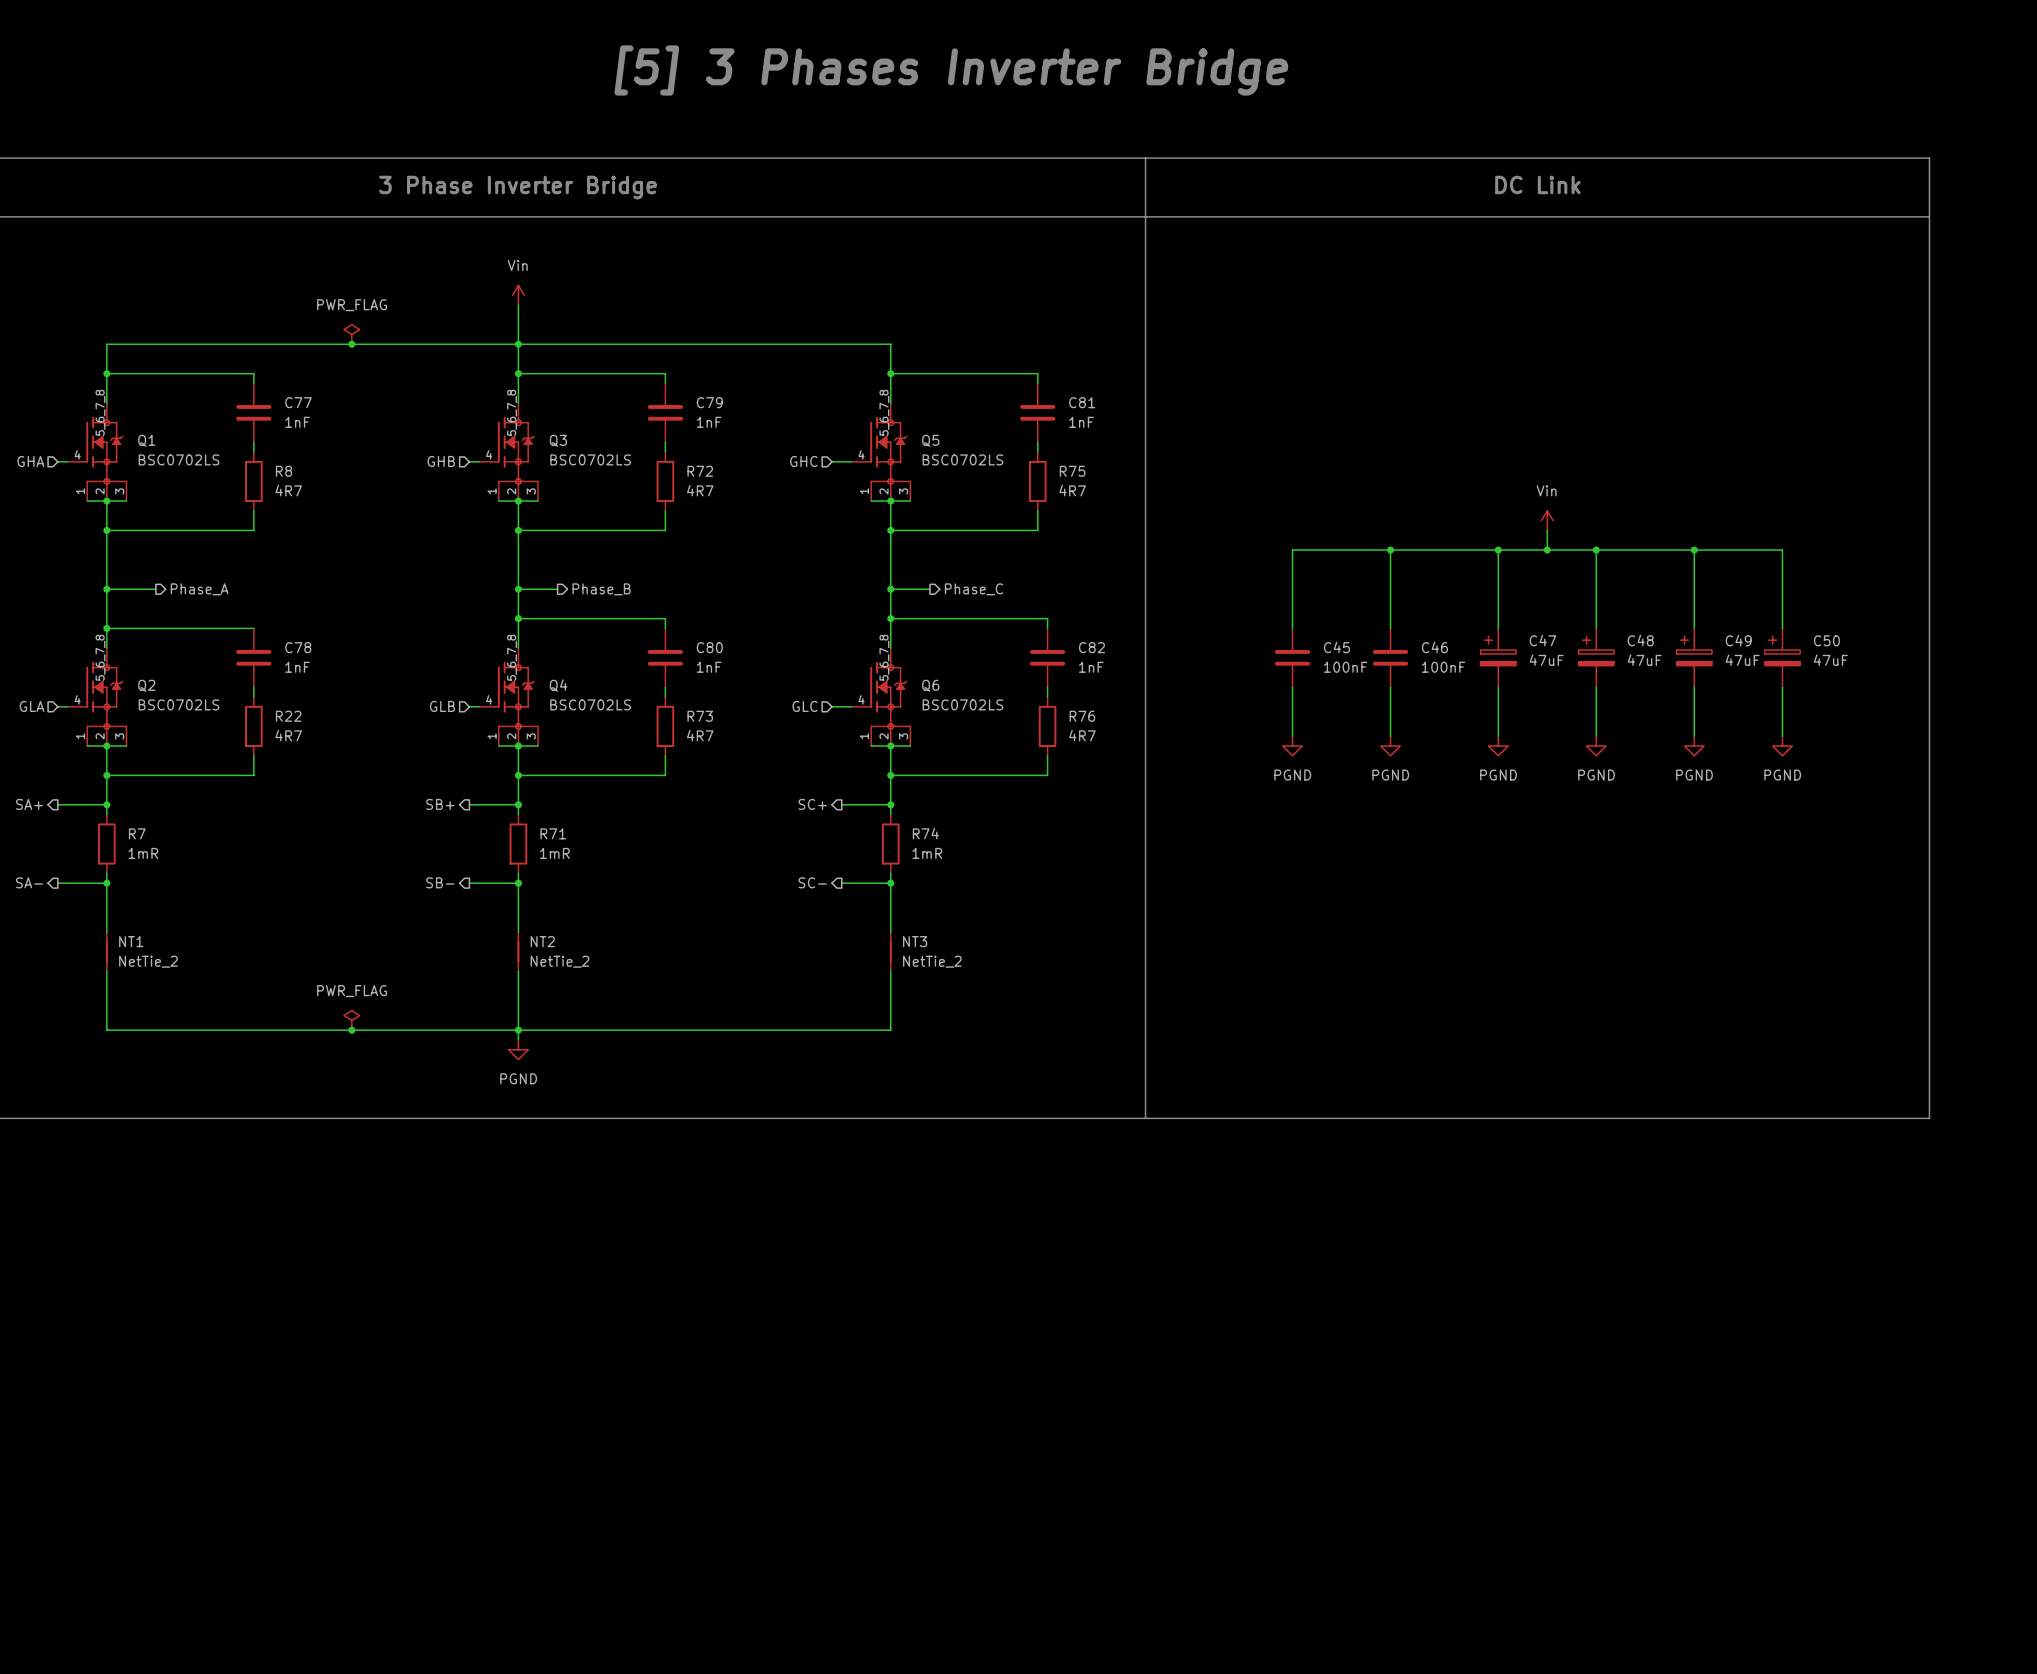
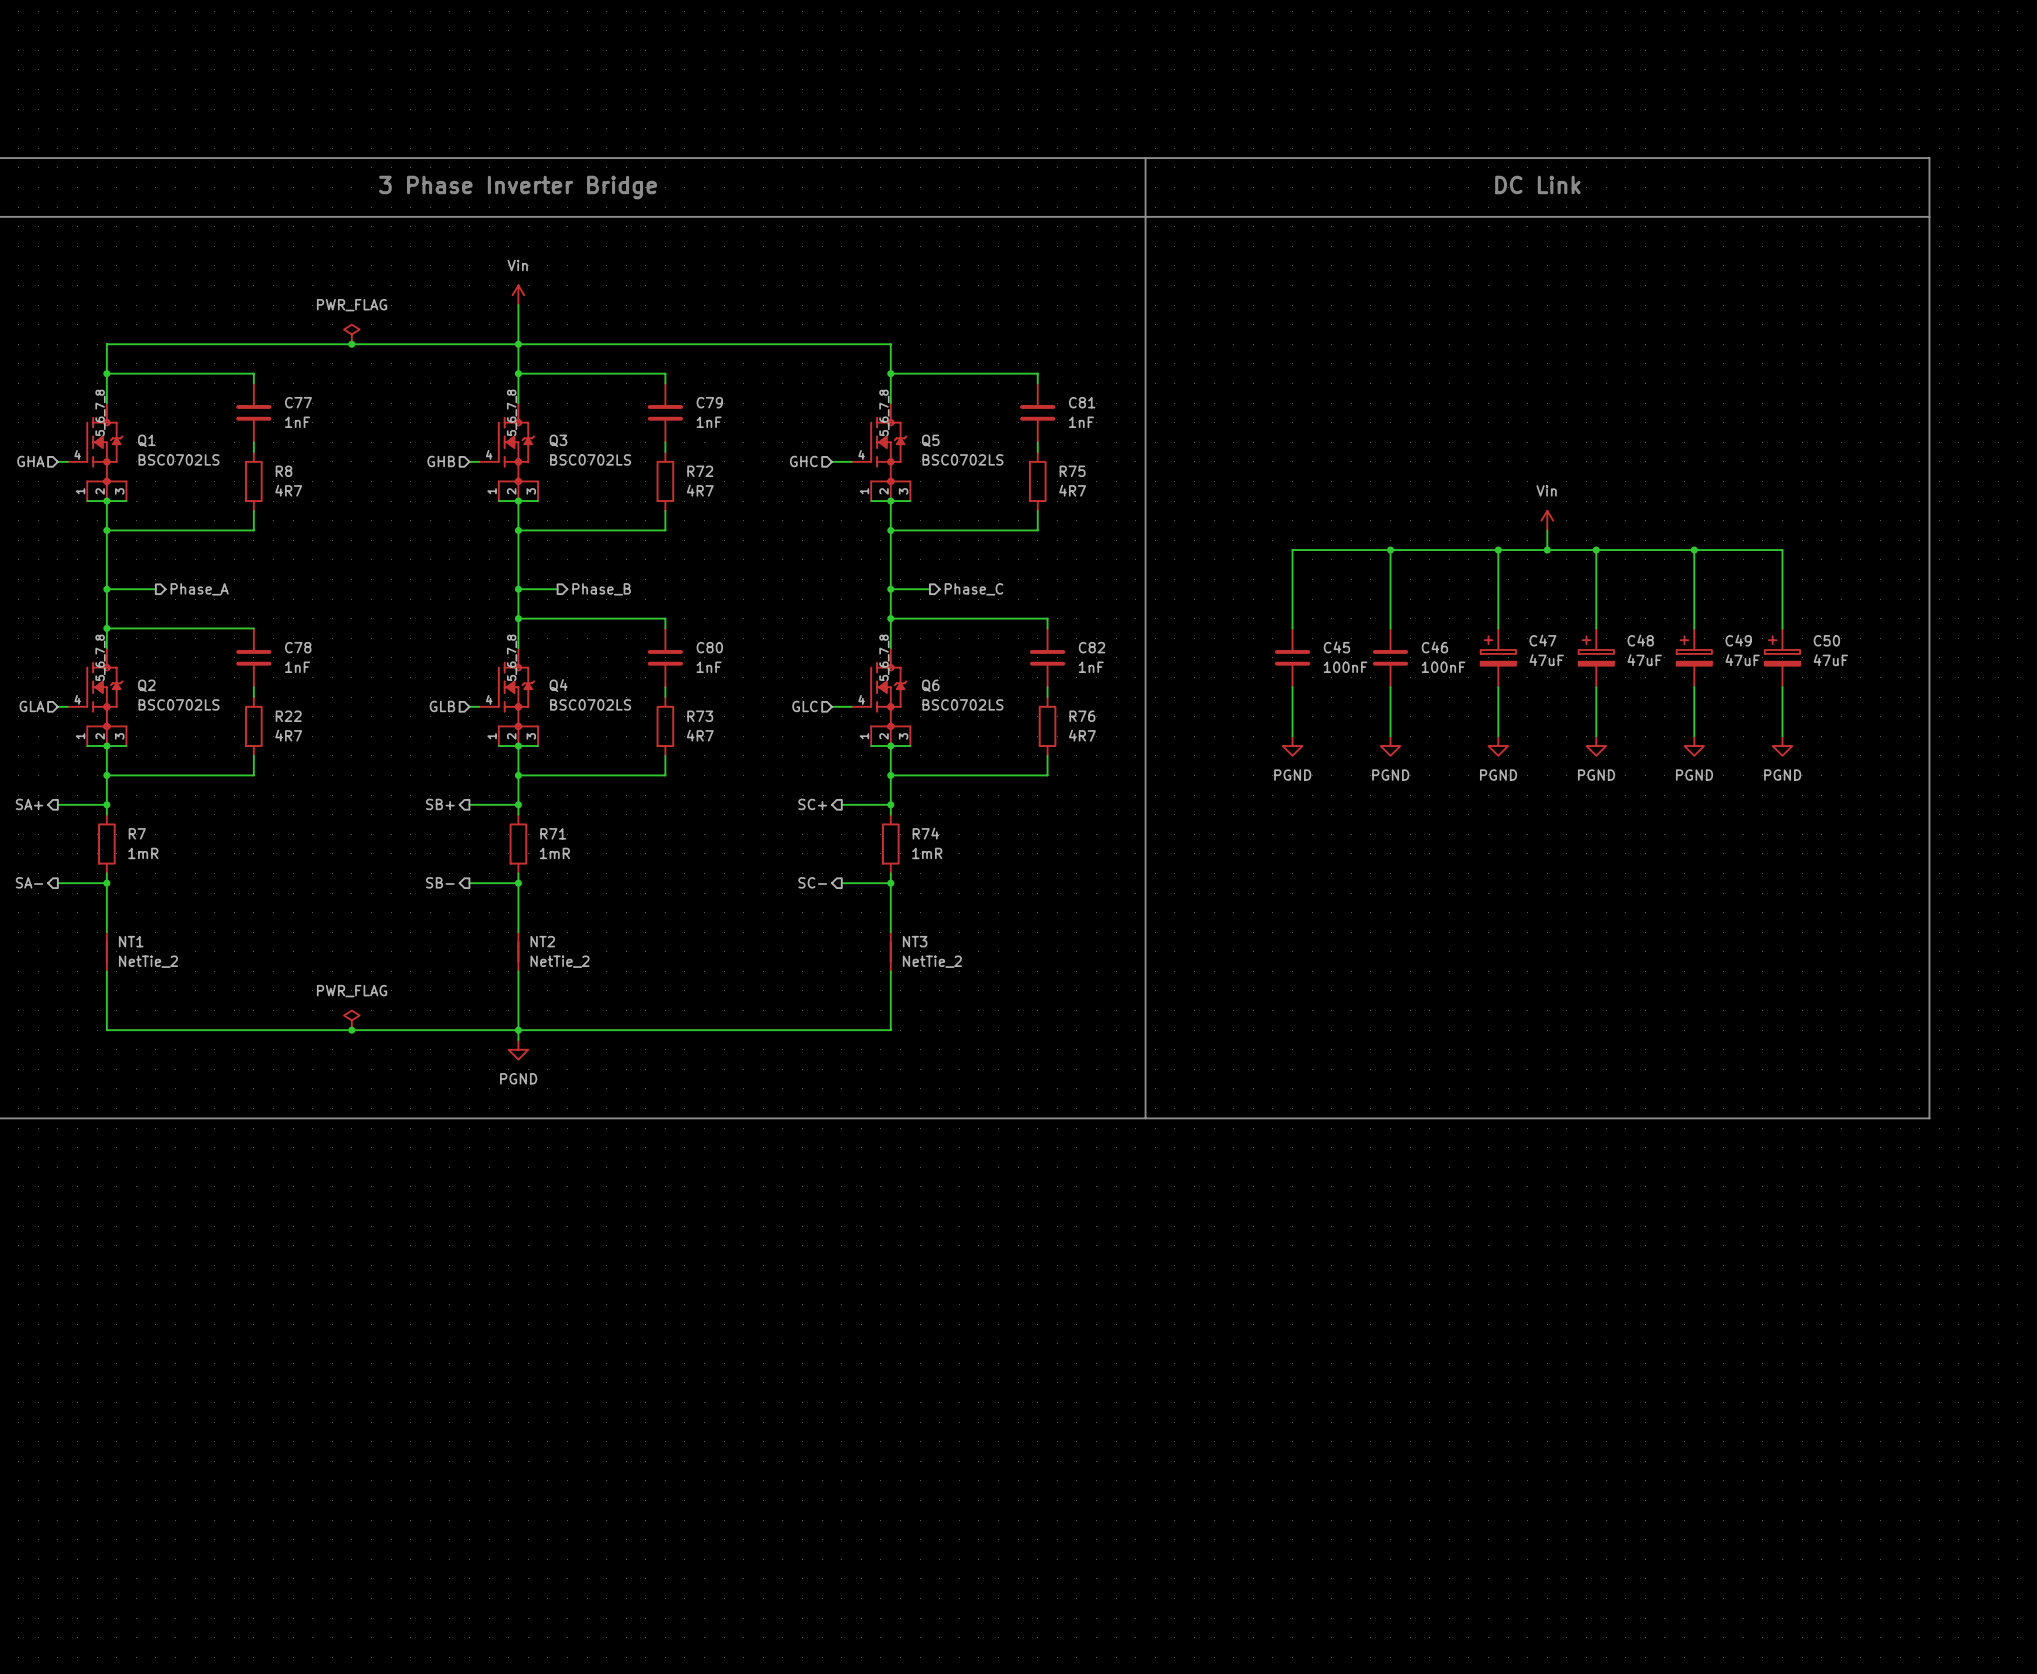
text: [5] 3 Phases Inverter Bridge (951, 70) -> none

